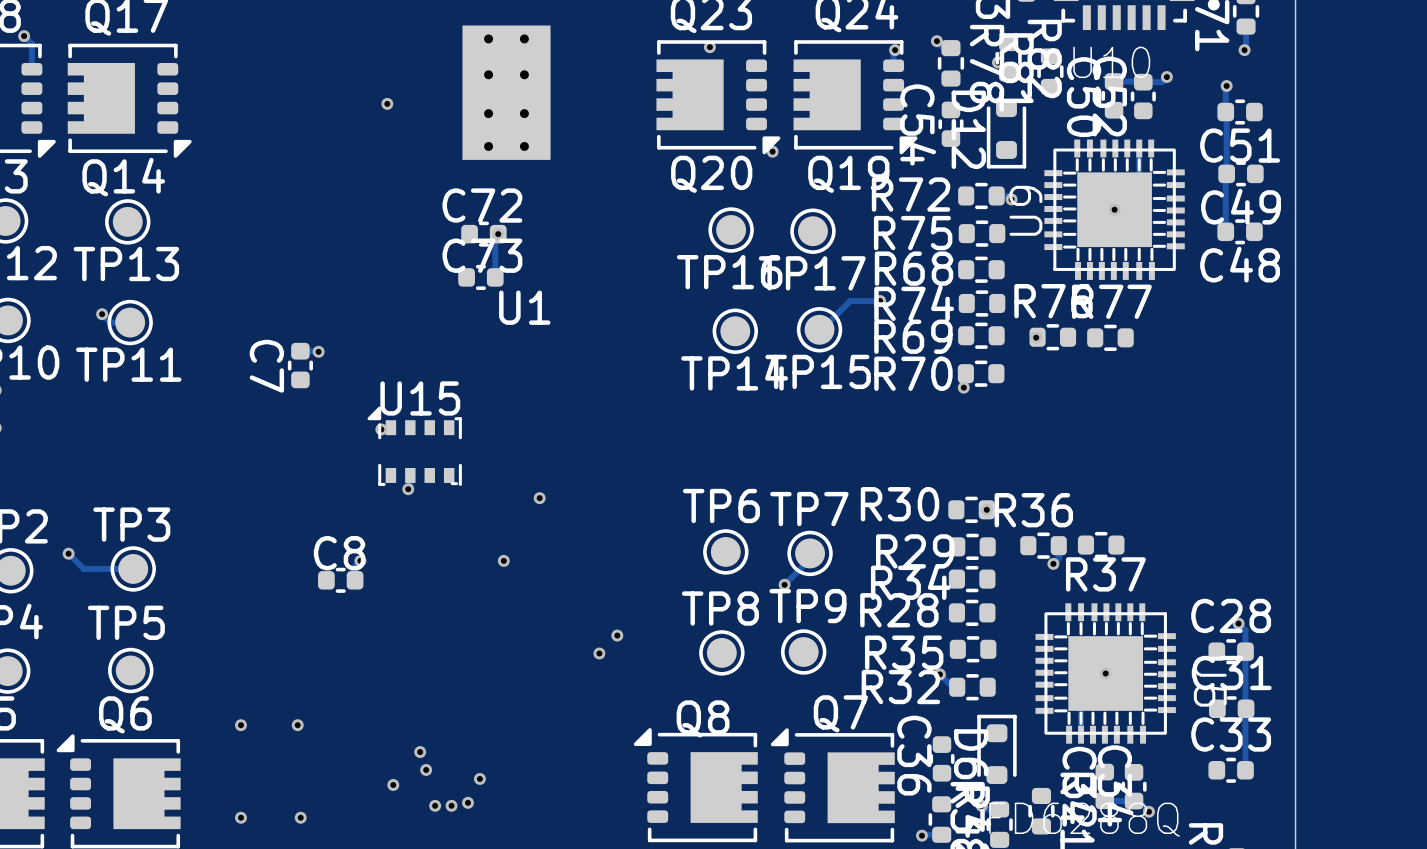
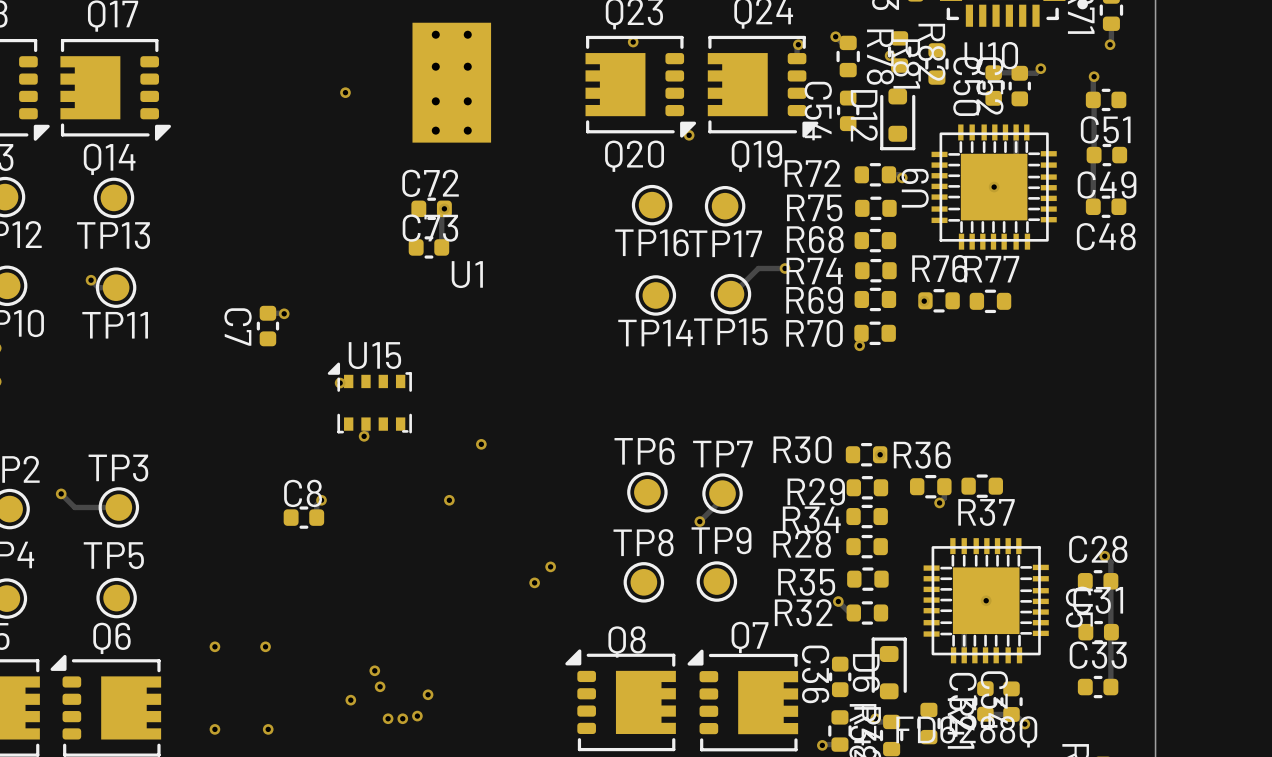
track: (24, 36) (31, 43) (31, 69) -> none
via: (24, 36) -> none

